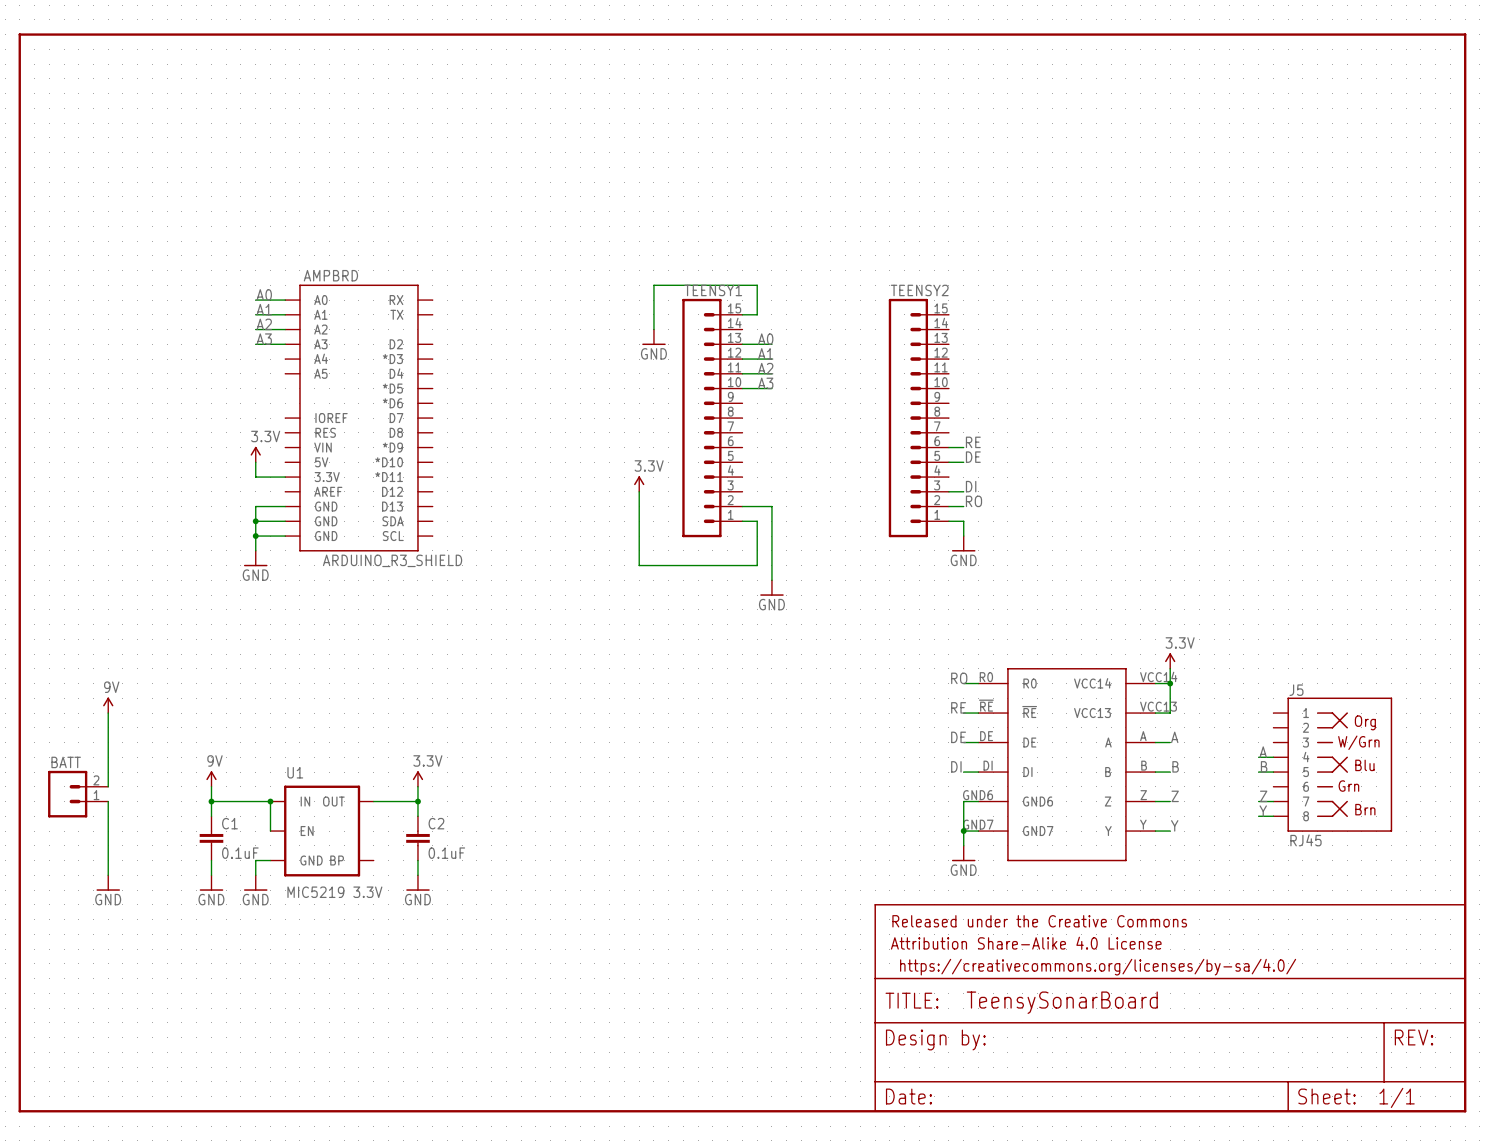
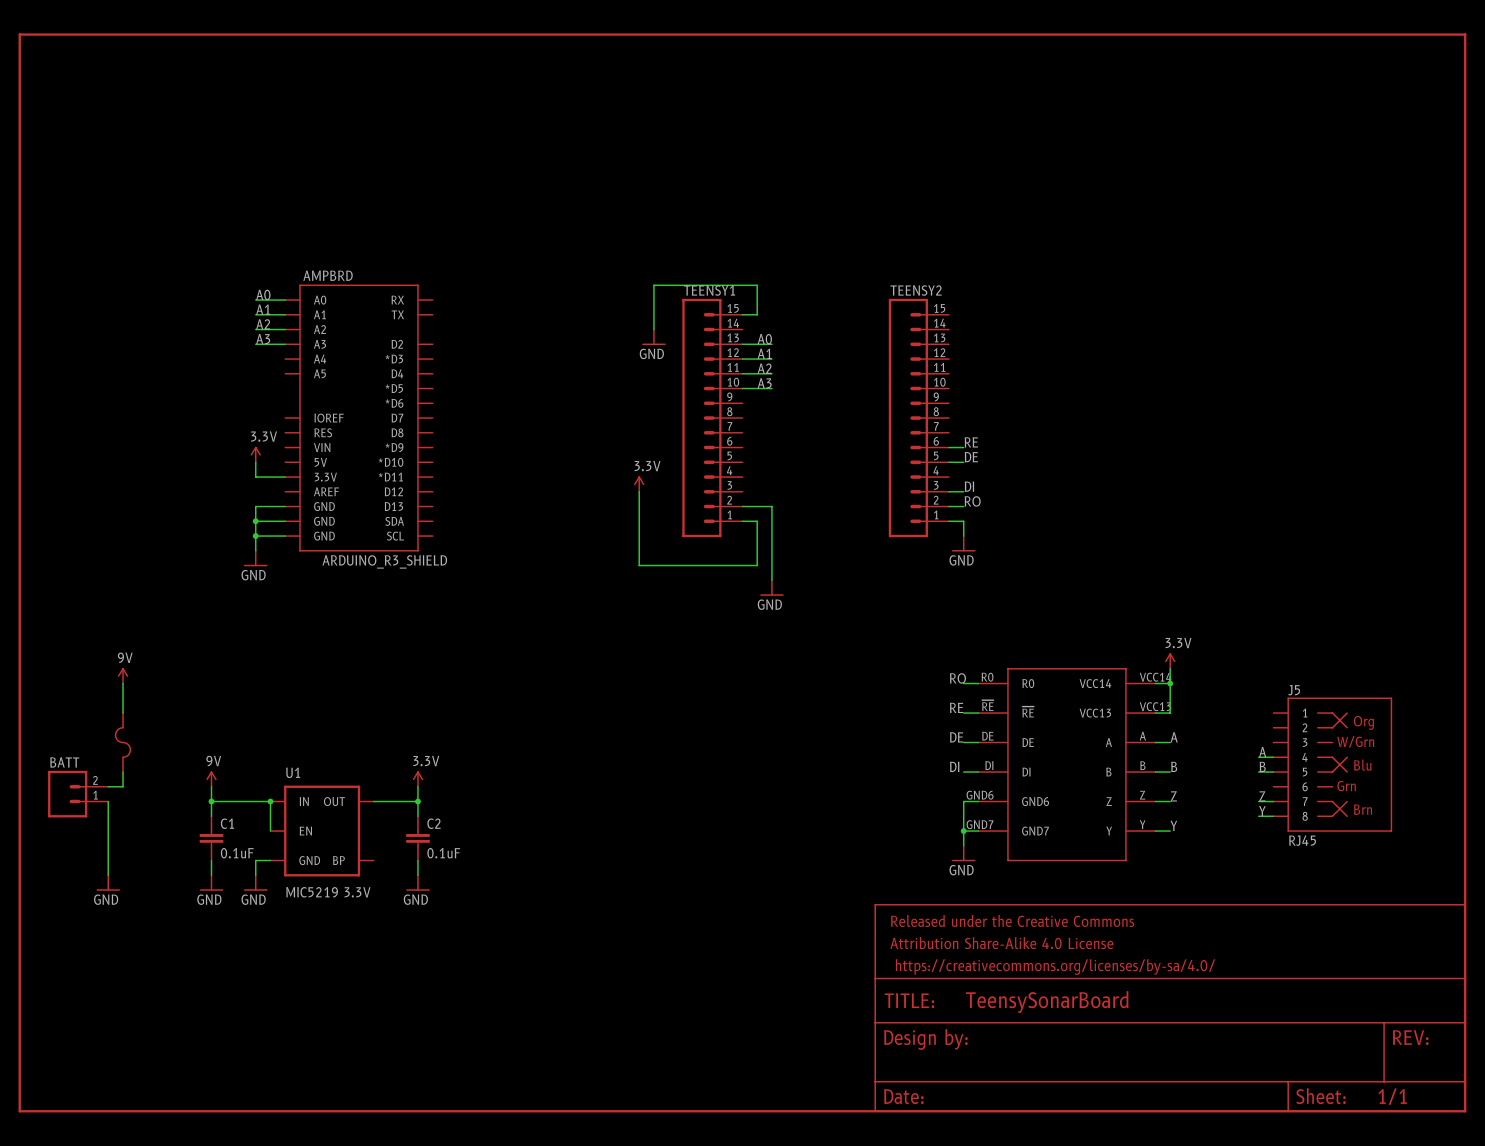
wire: none -> (122, 683) (122, 713)
power symbol position: 9V (108, 705) -> 9V (122, 675)
wire: (108, 713) (108, 786) -> (122, 772) (122, 786) (108, 786)
part: none -> (122, 742)

